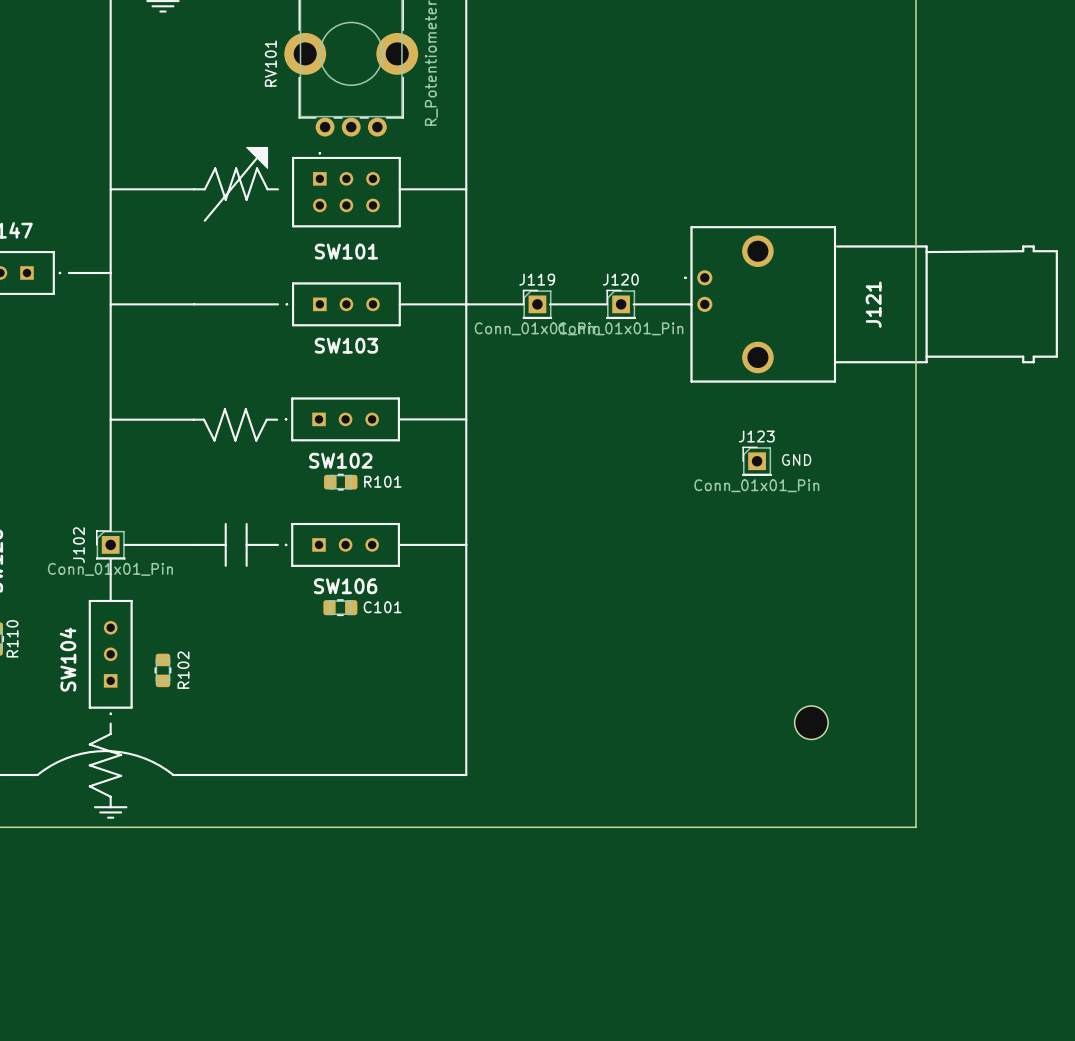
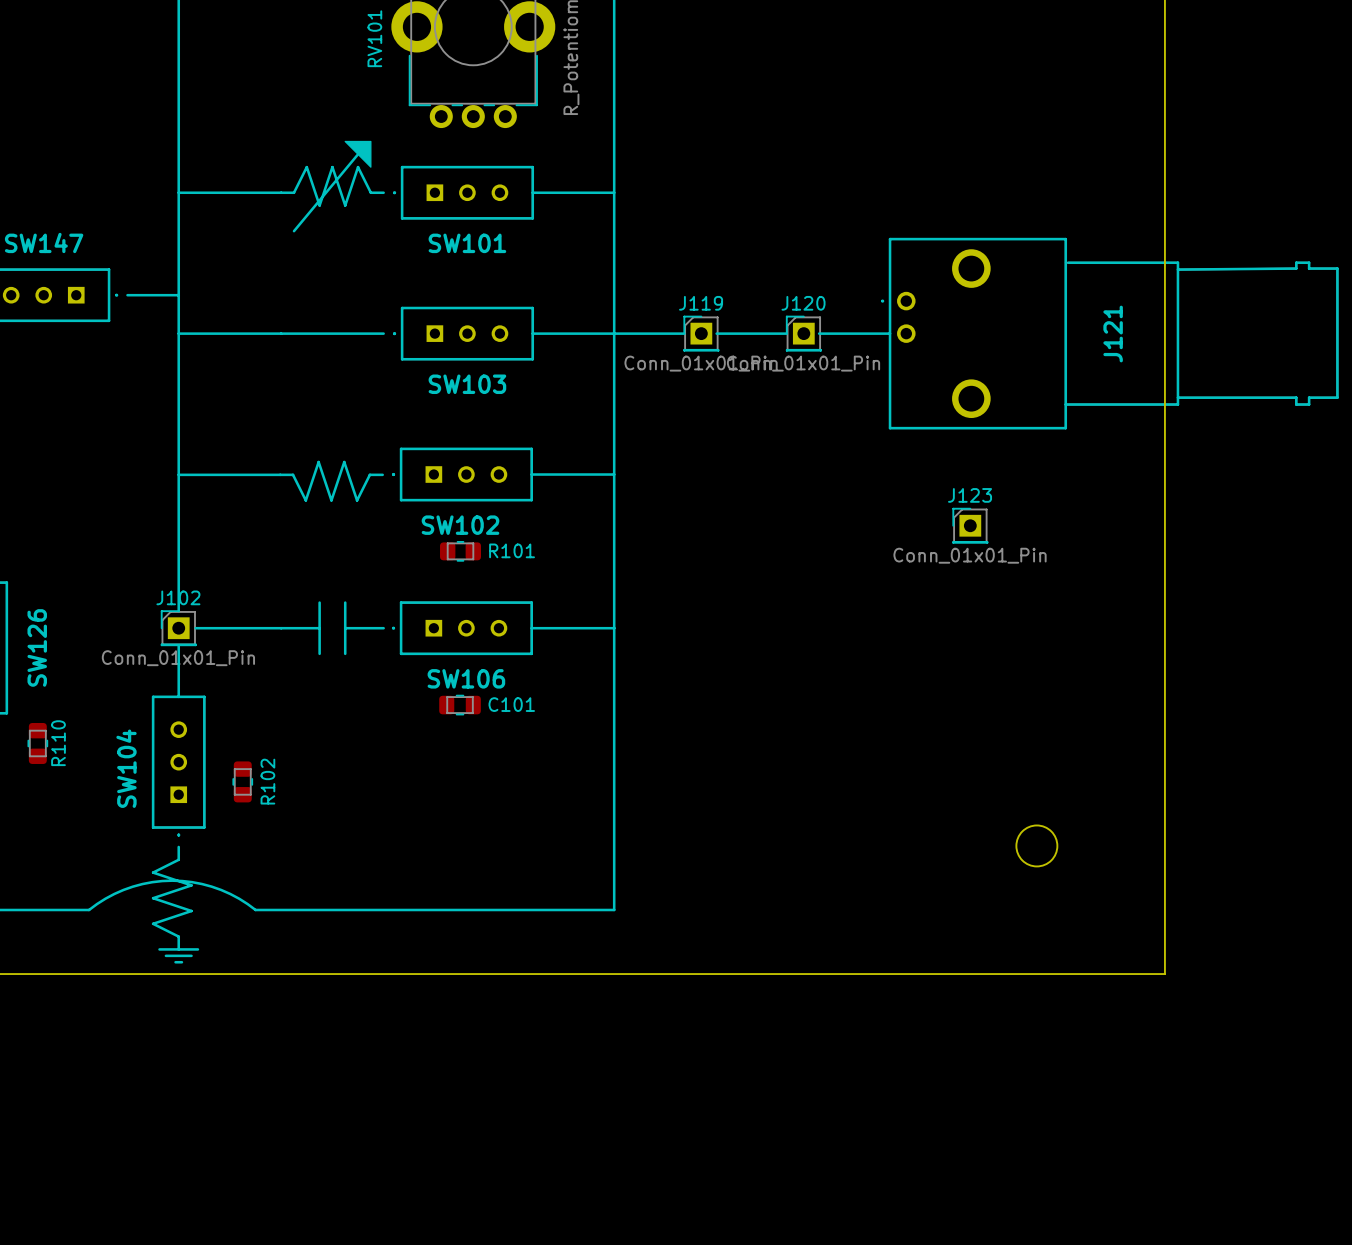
SW101 footprint: [292, 152, 401, 228] -> [393, 165, 535, 220]
text: GND (796, 459) -> none
J102 name rotation: 0° (78, 545) -> 90° clockwise (178, 597)

